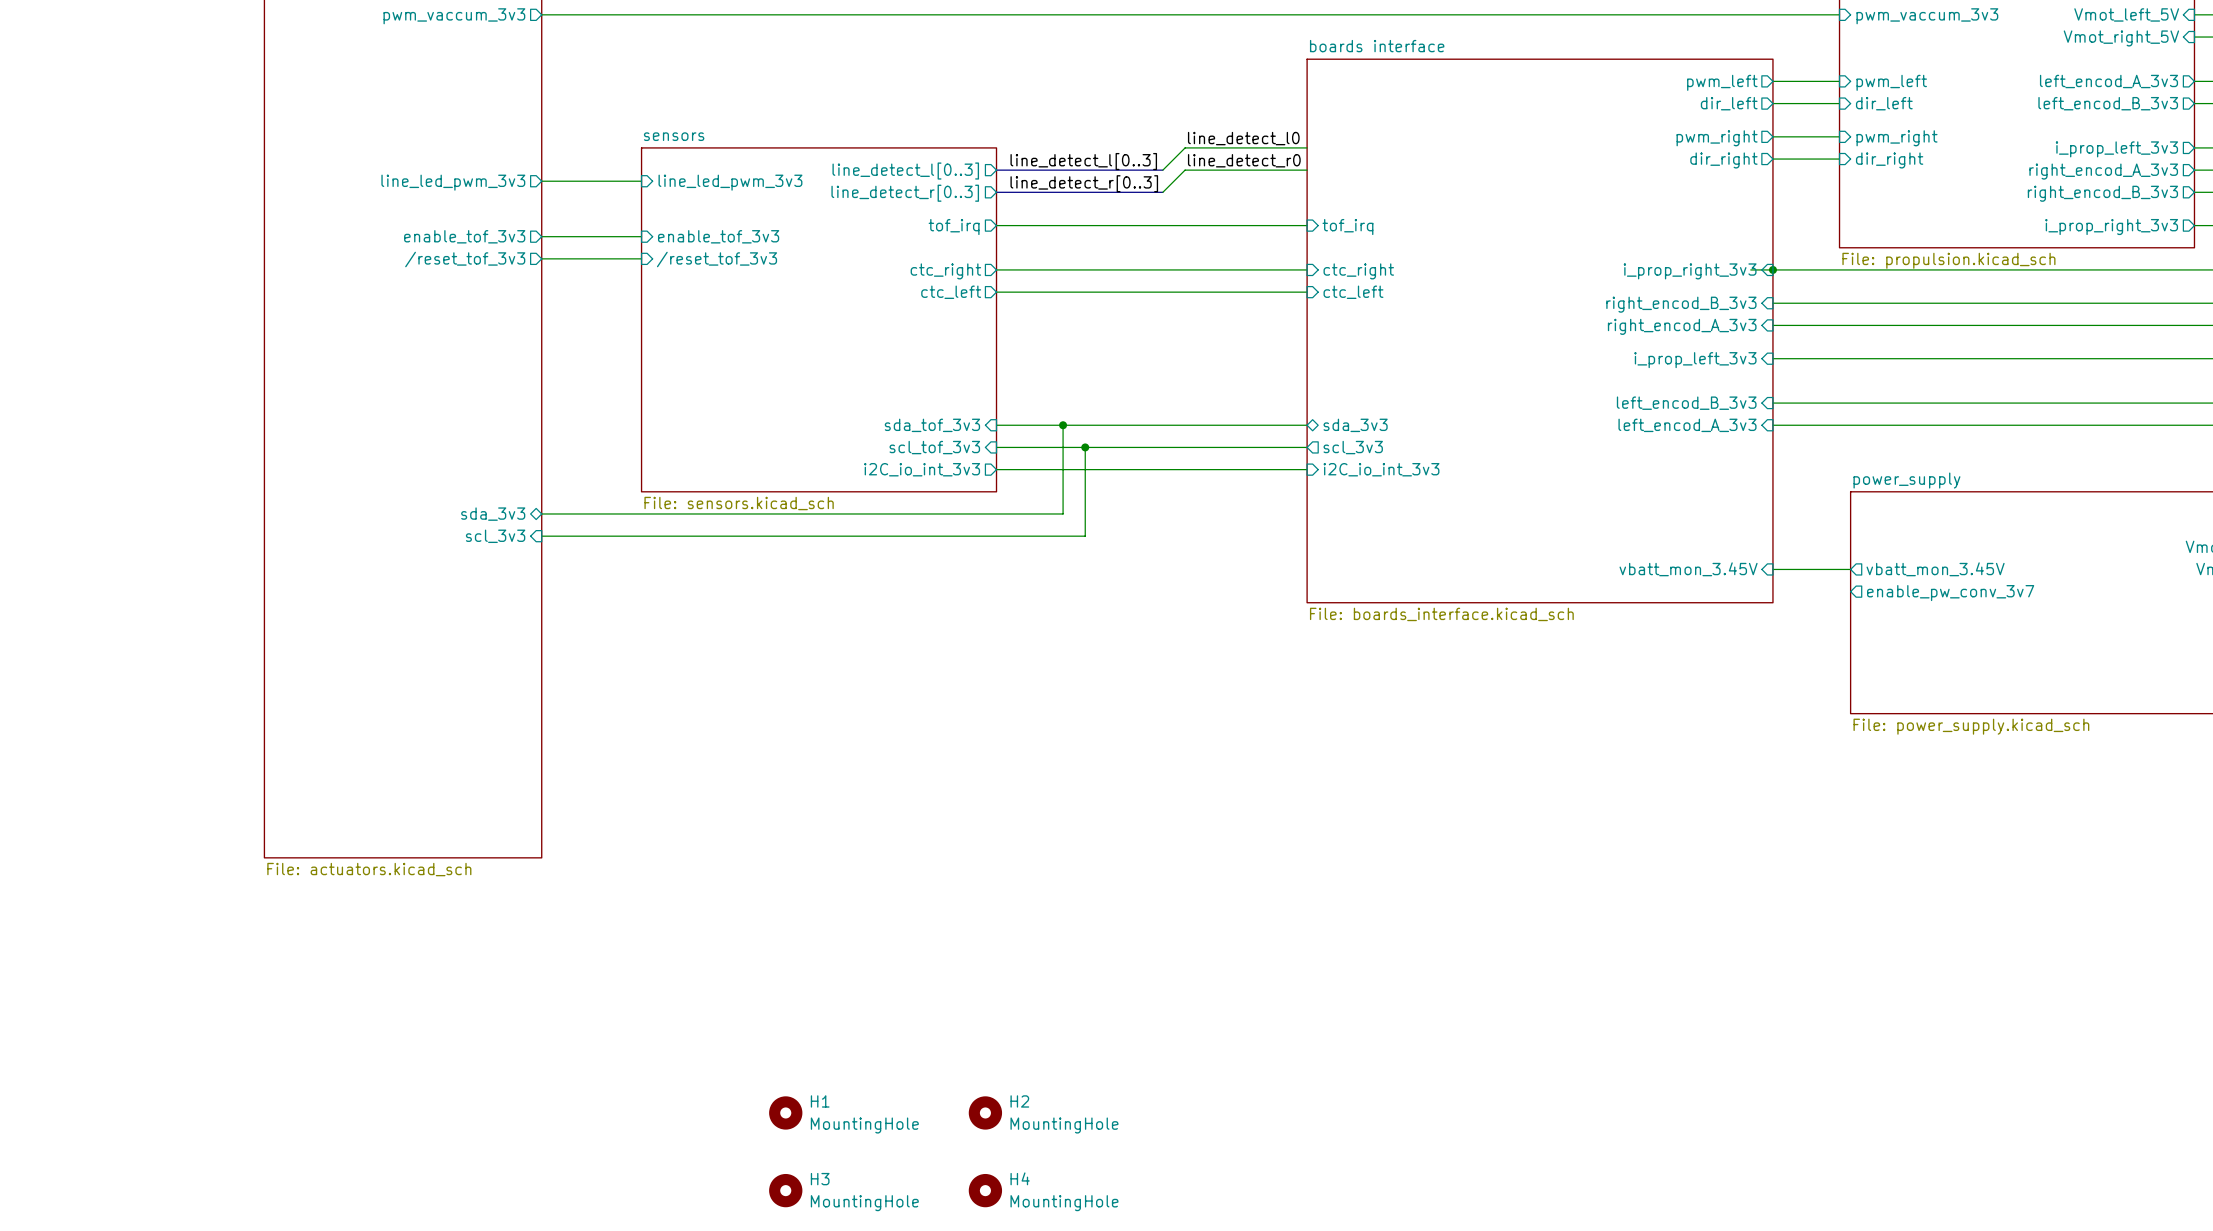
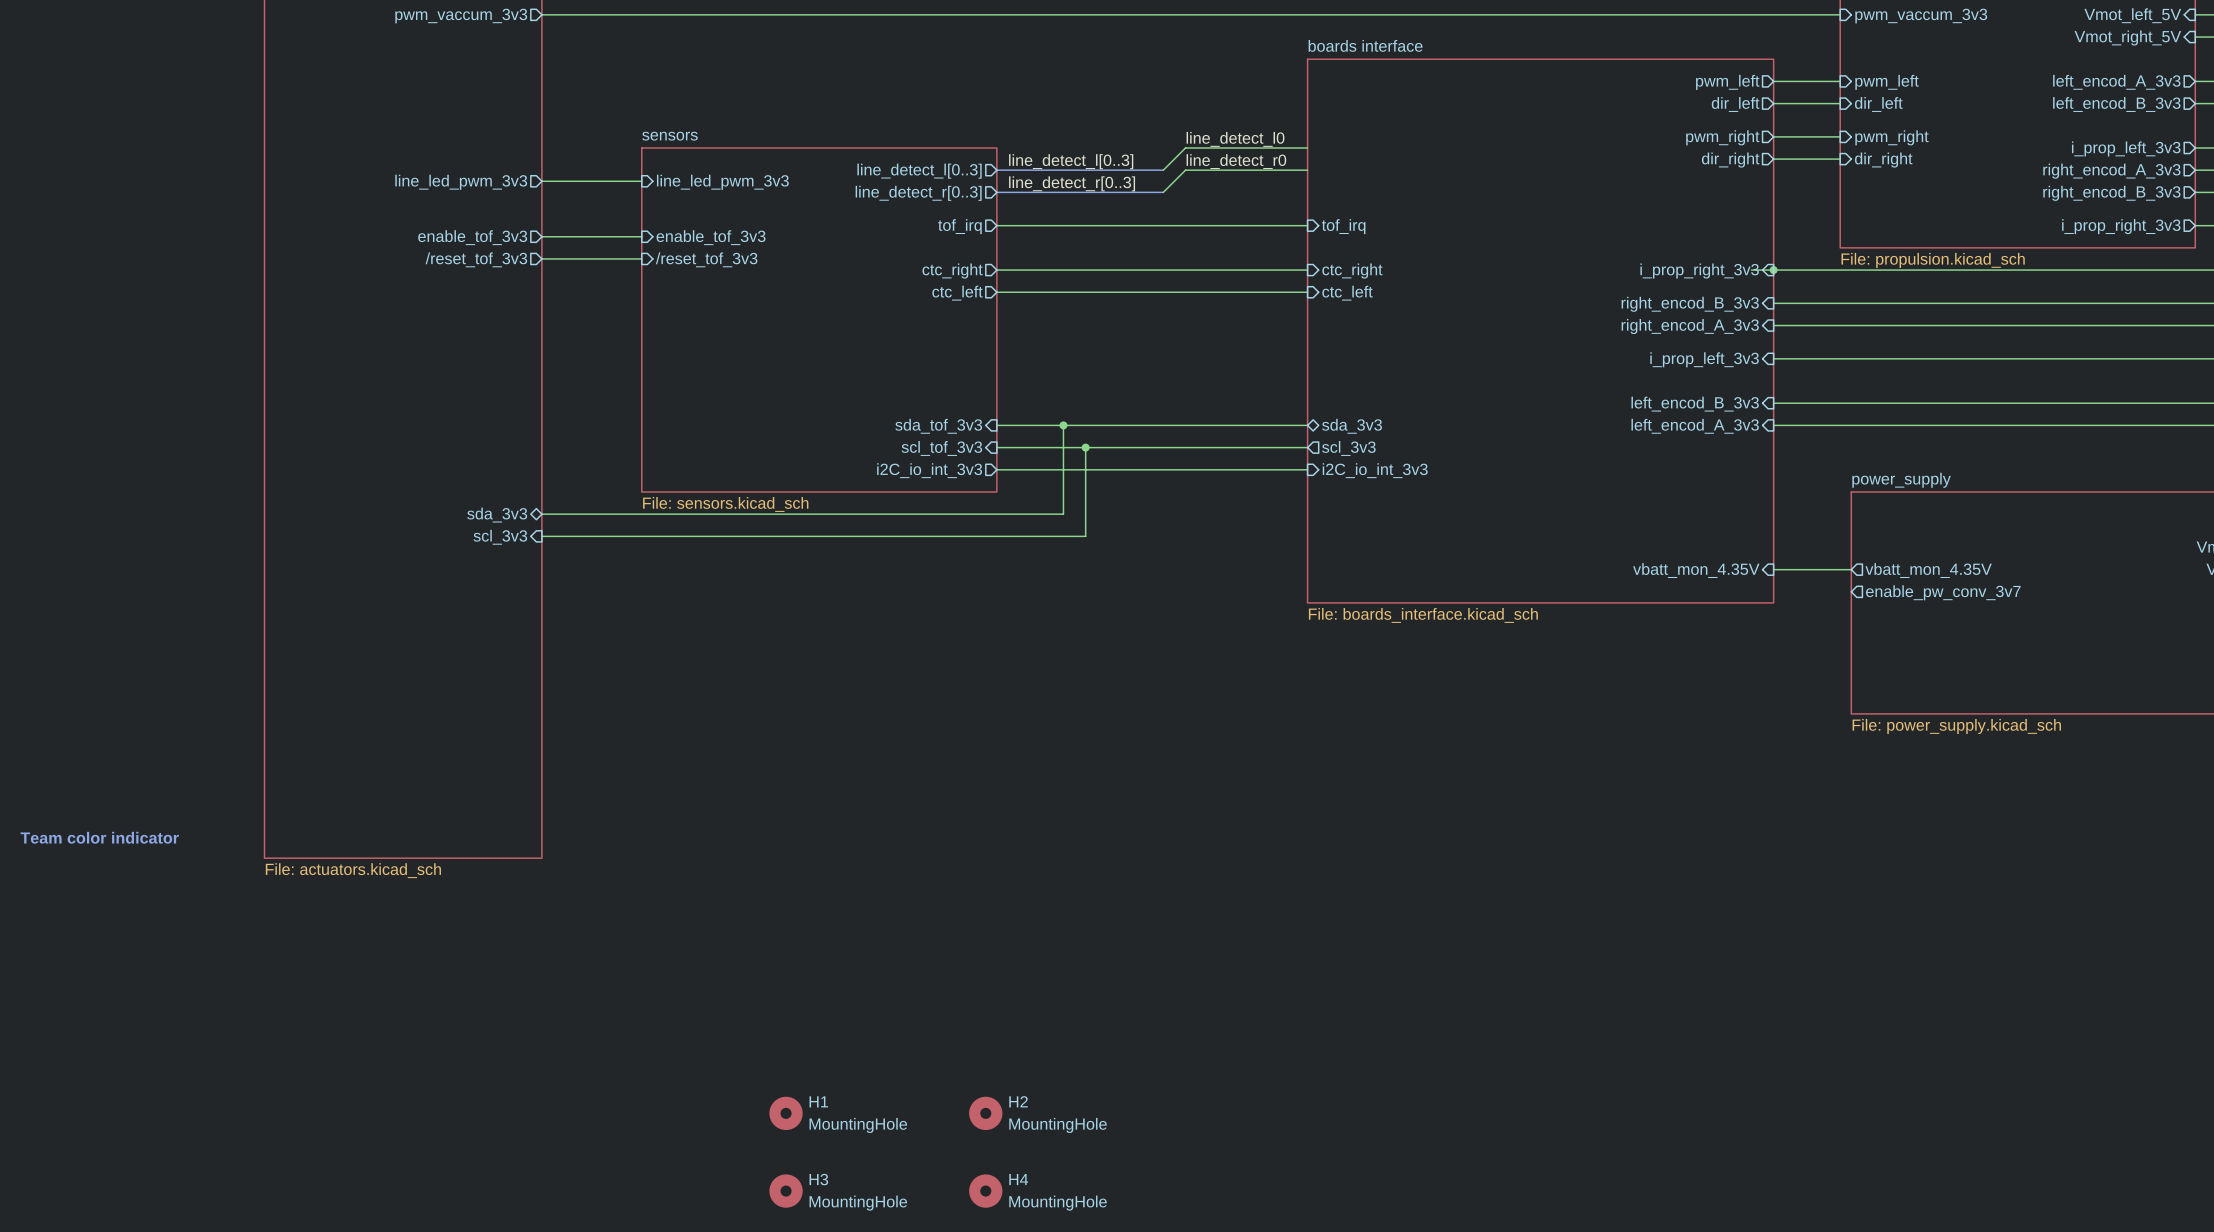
sheet pin: vbatt_mon_3.45V (1688, 569) -> vbatt_mon_4.35V (1696, 570)
sheet pin: vbatt_mon_3.45V (1935, 569) -> vbatt_mon_4.35V (1928, 570)
text: none -> Team color indicator (99, 837)

